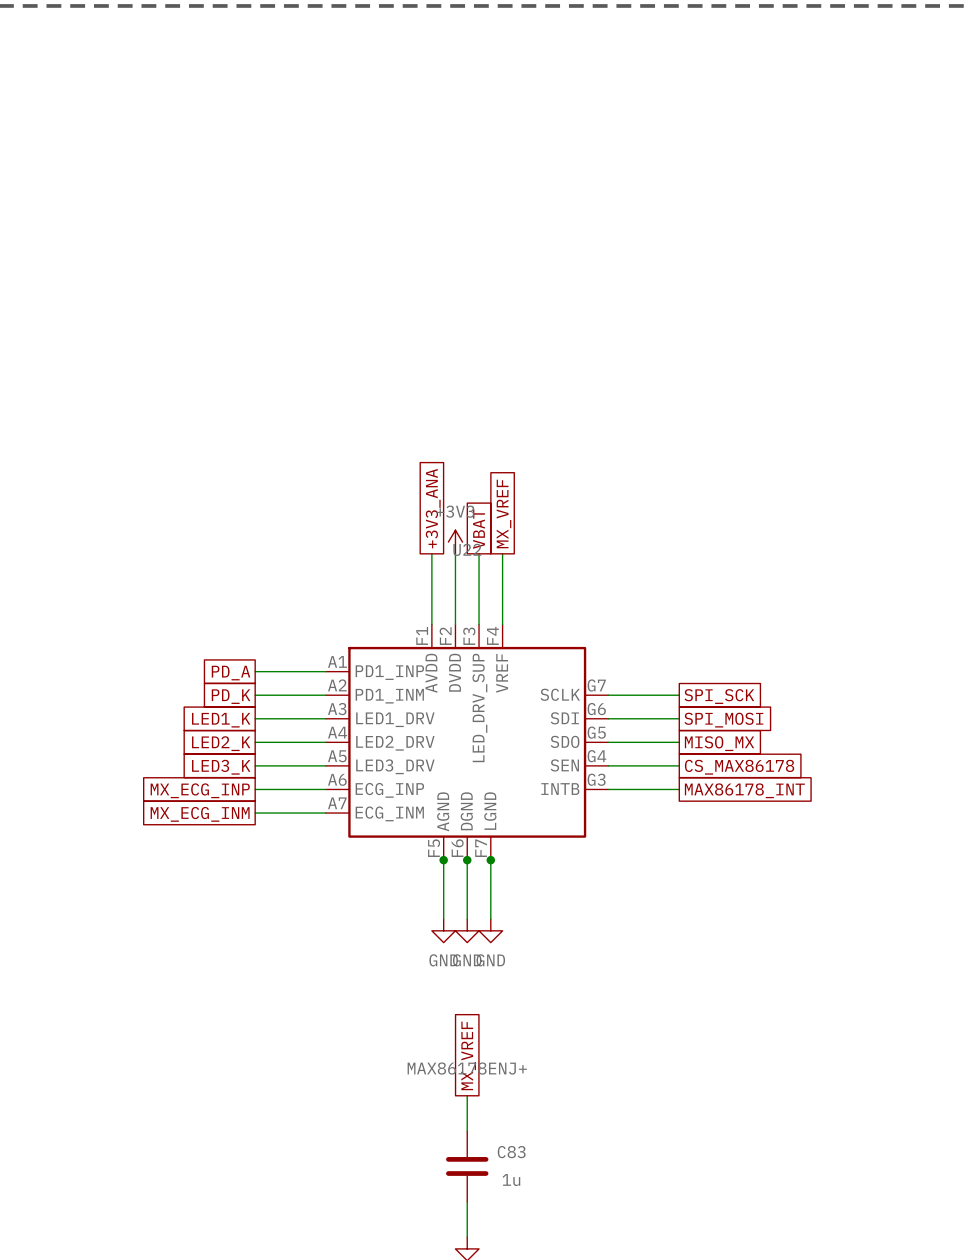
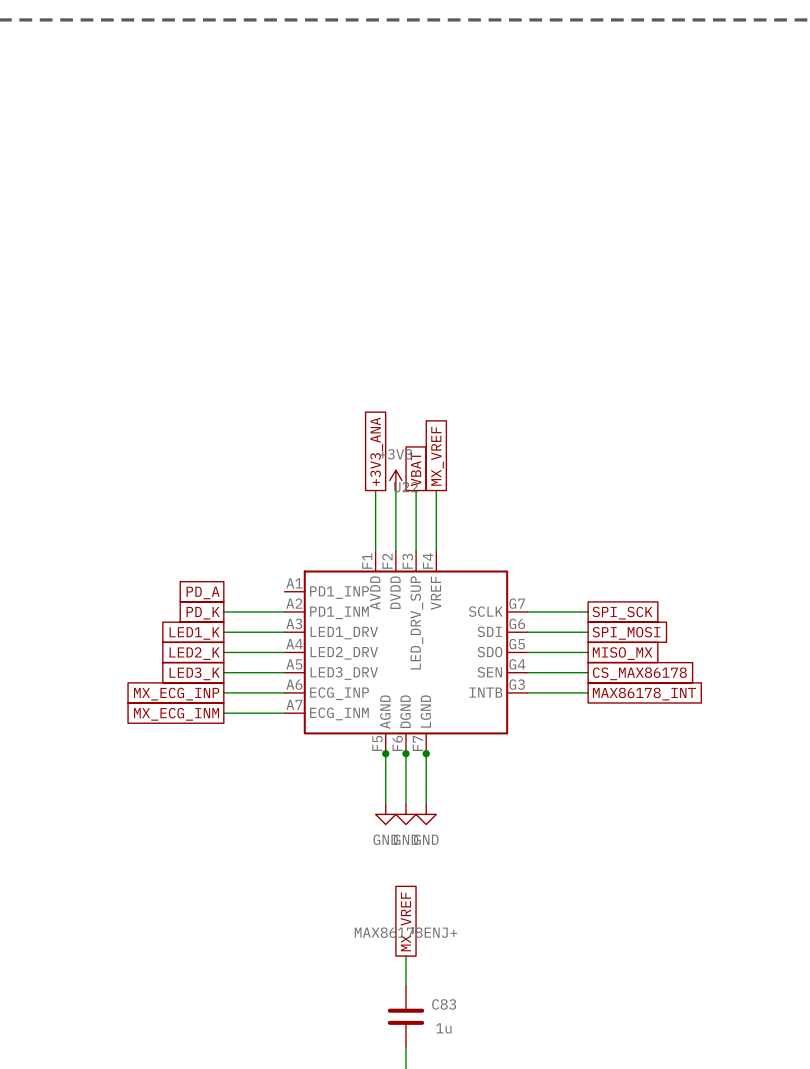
wire: (255, 671) (325, 671) -> none

